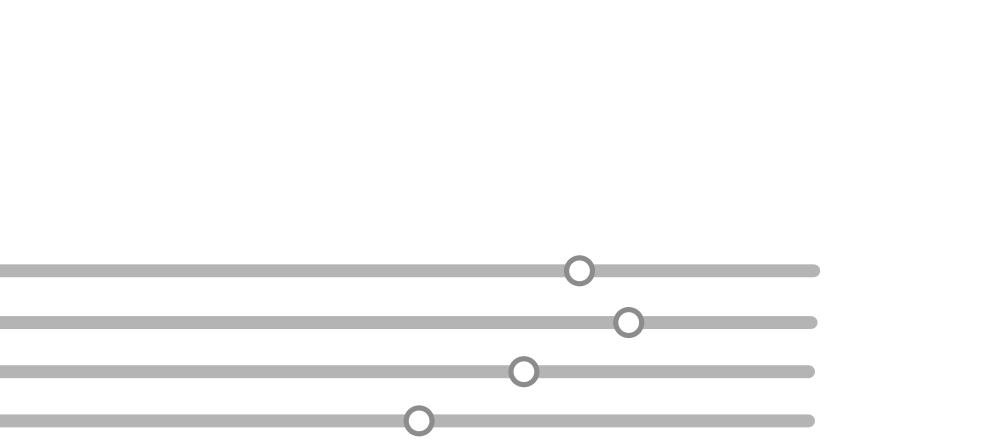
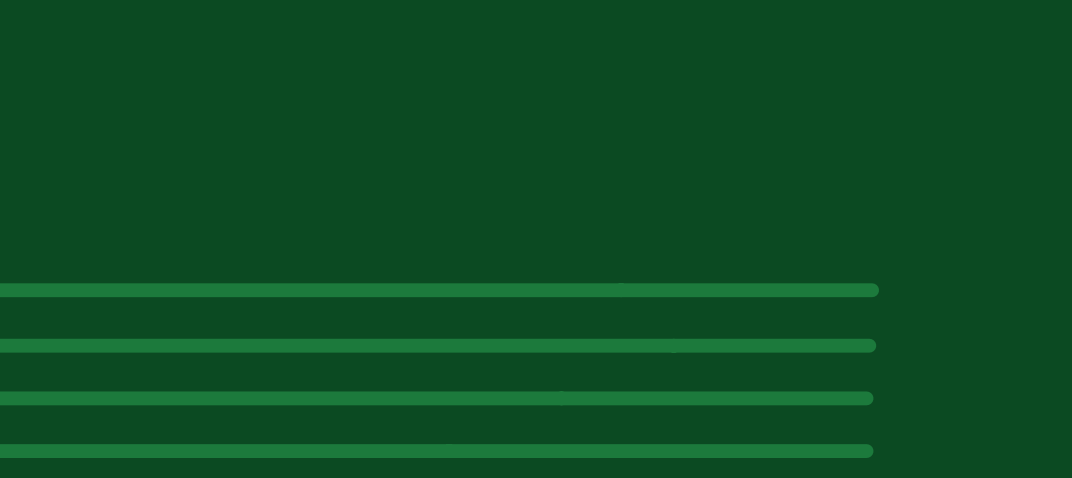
via: (579, 270) -> none
via: (628, 322) -> none
via: (523, 371) -> none
via: (419, 420) -> none

